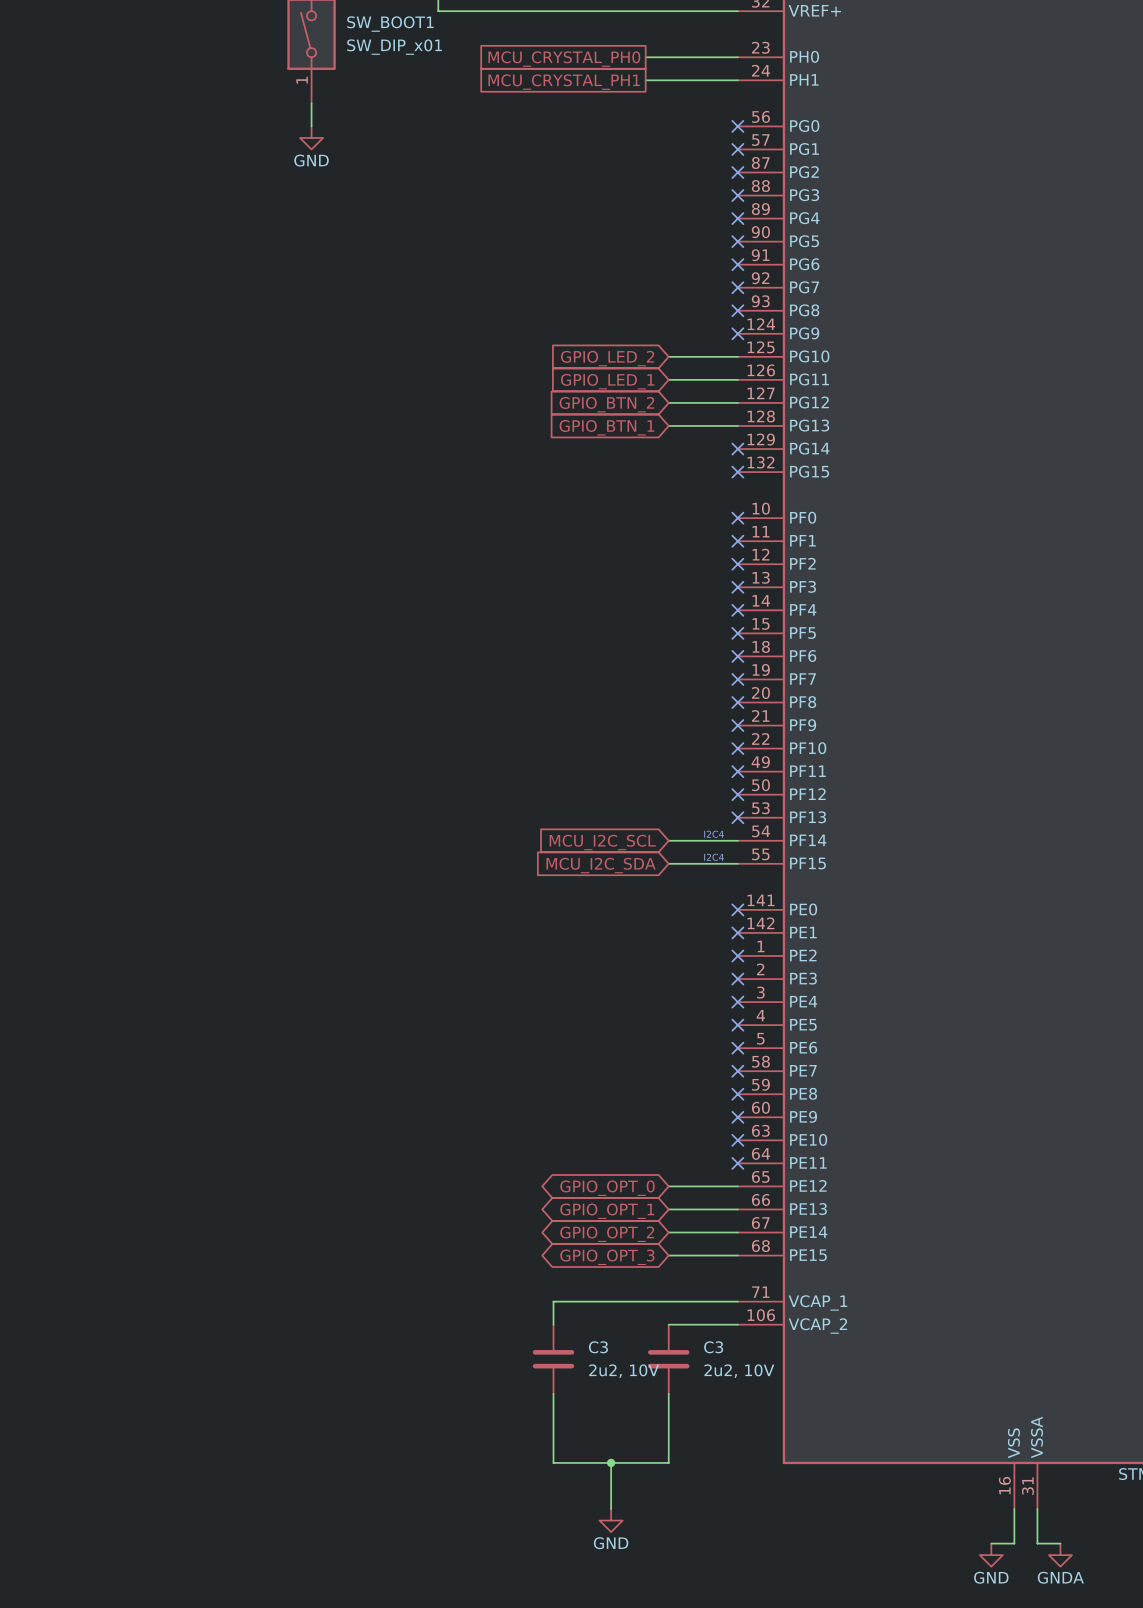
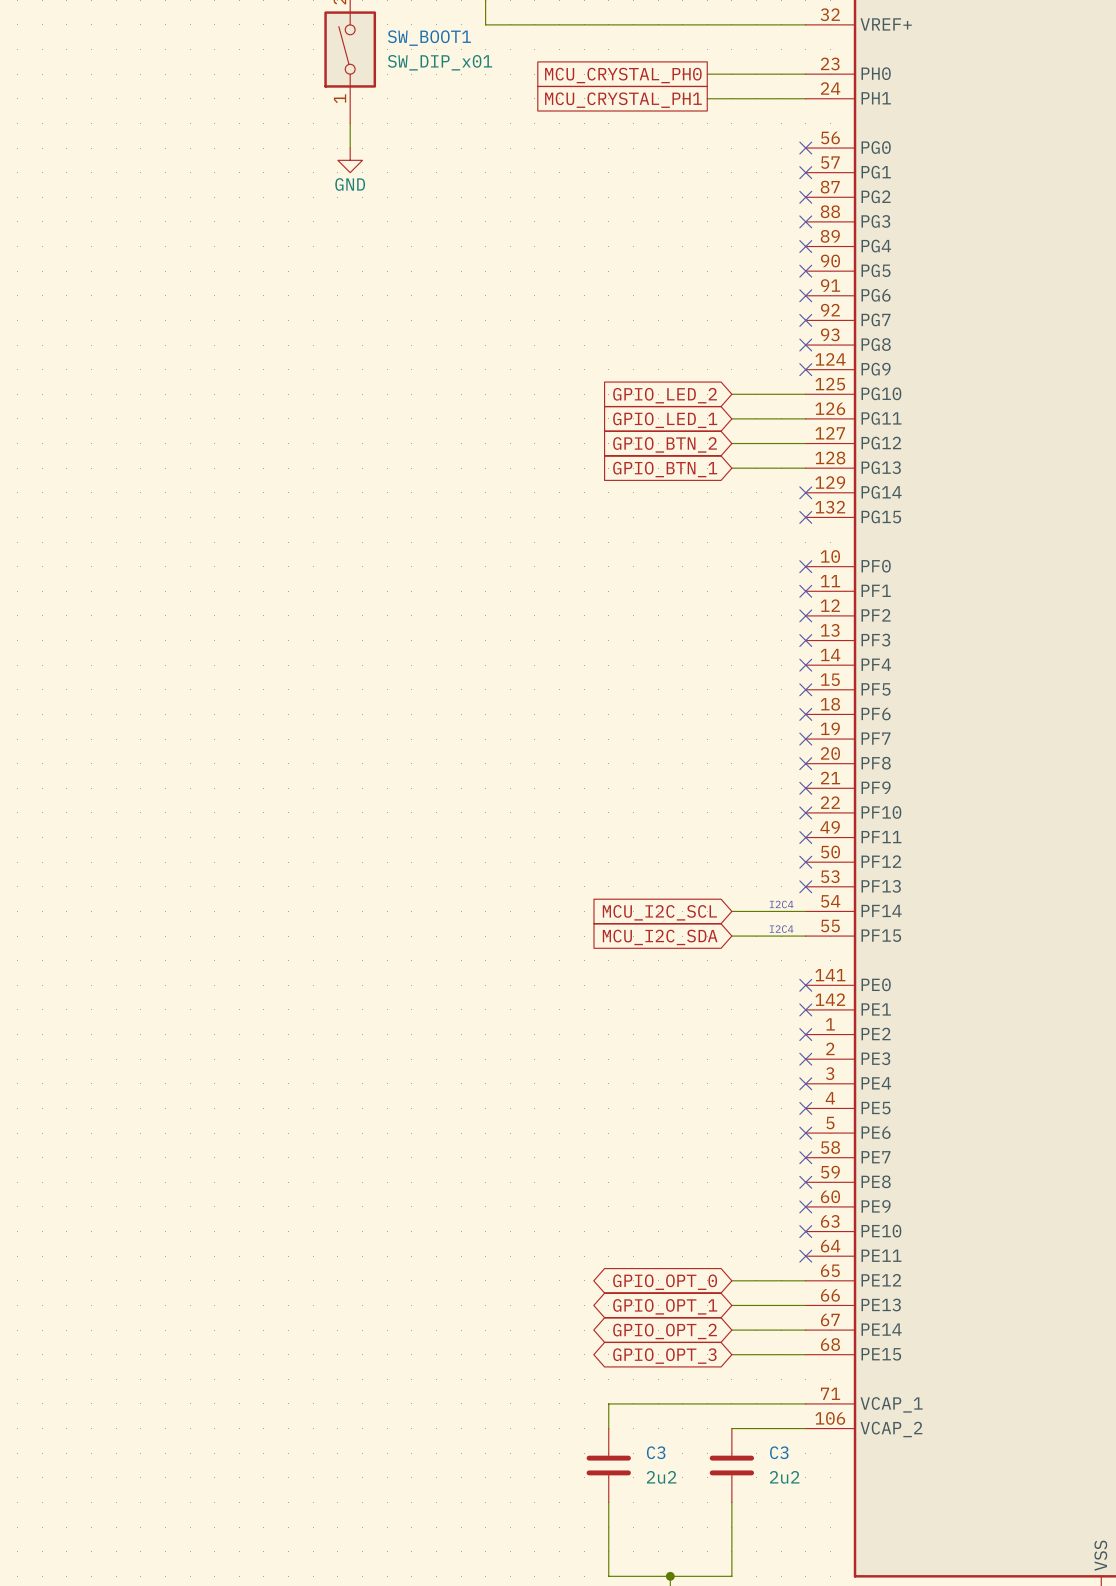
C3 value: 2u2, 10V (624, 1371) -> 2u2 (661, 1477)
C3 value: 2u2, 10V (739, 1371) -> 2u2 (784, 1477)

